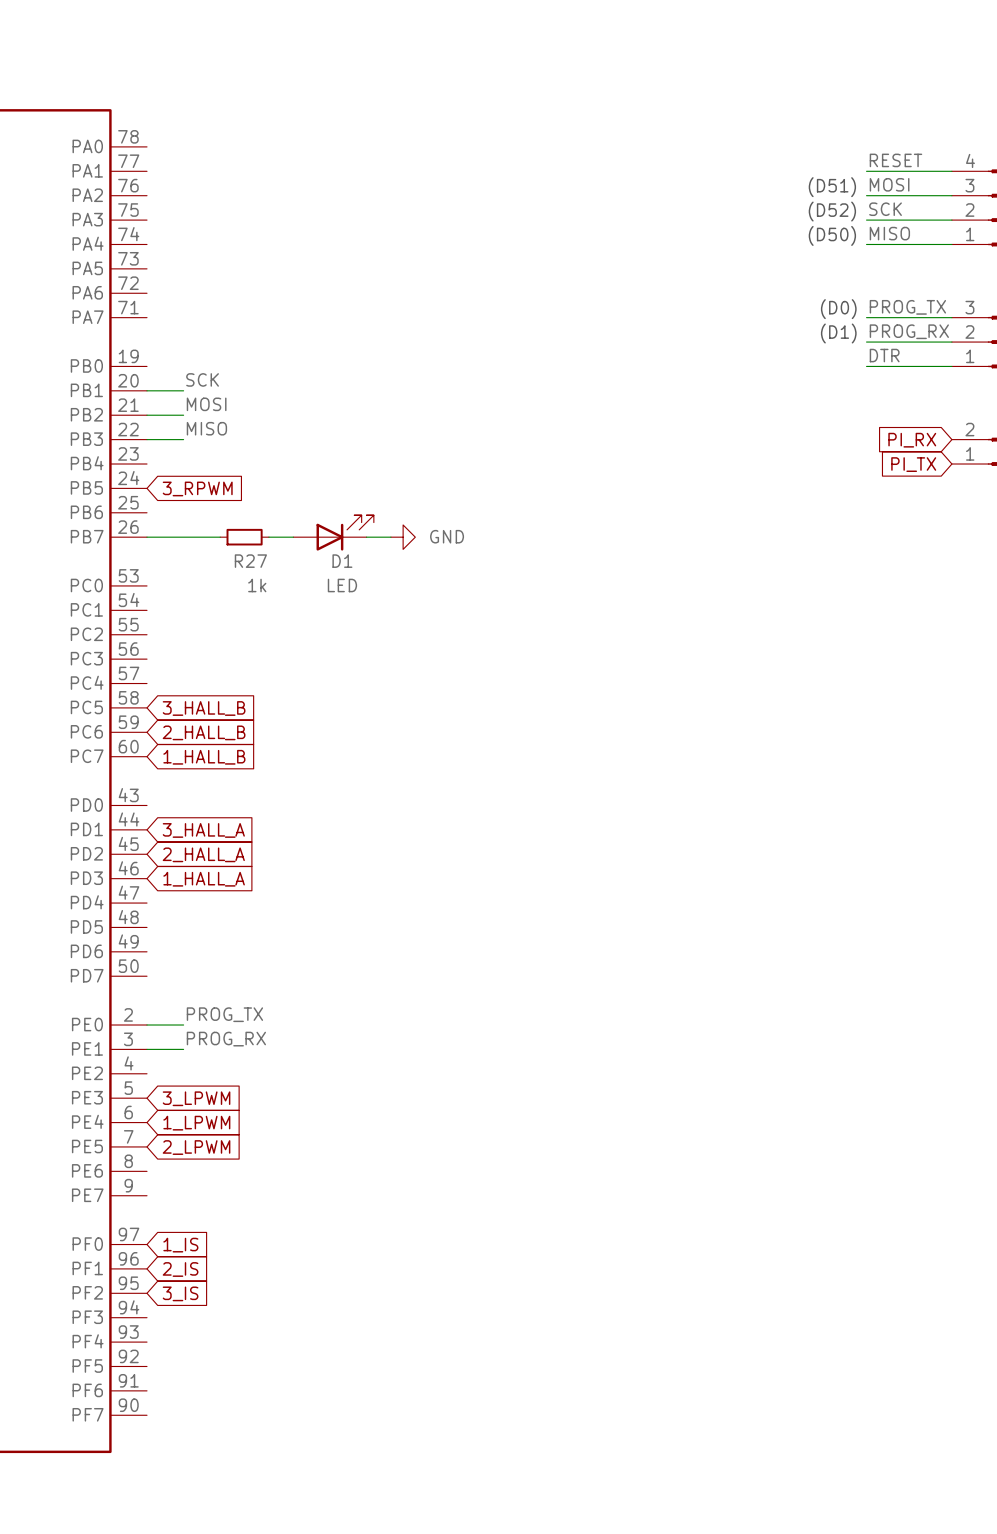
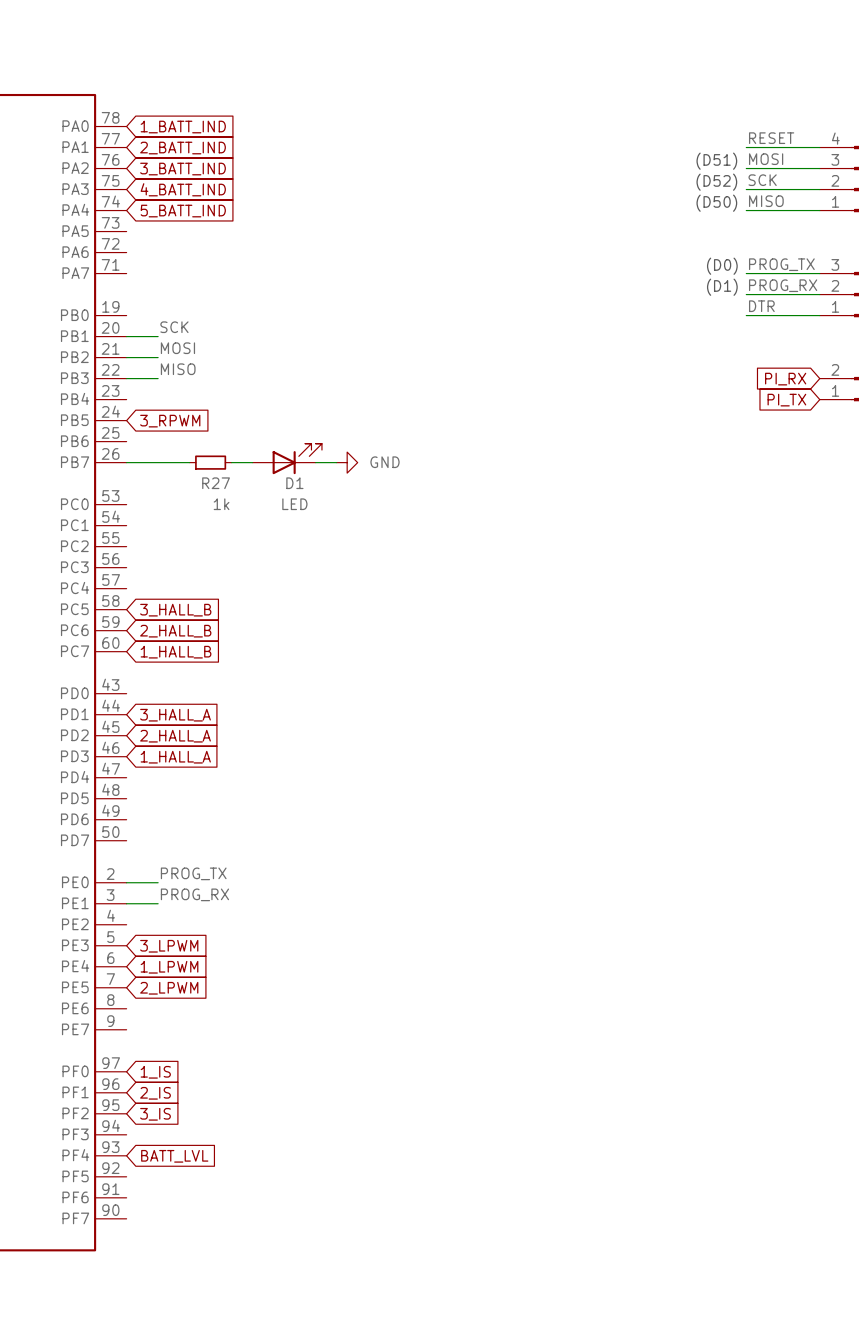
global label: none -> 1_BATT_IND (183, 127)
global label: none -> 2_BATT_IND (183, 148)
global label: none -> 3_BATT_IND (183, 169)
global label: none -> 4_BATT_IND (183, 189)
global label: none -> 5_BATT_IND (183, 211)
global label: none -> BATT_LVL (174, 1156)

